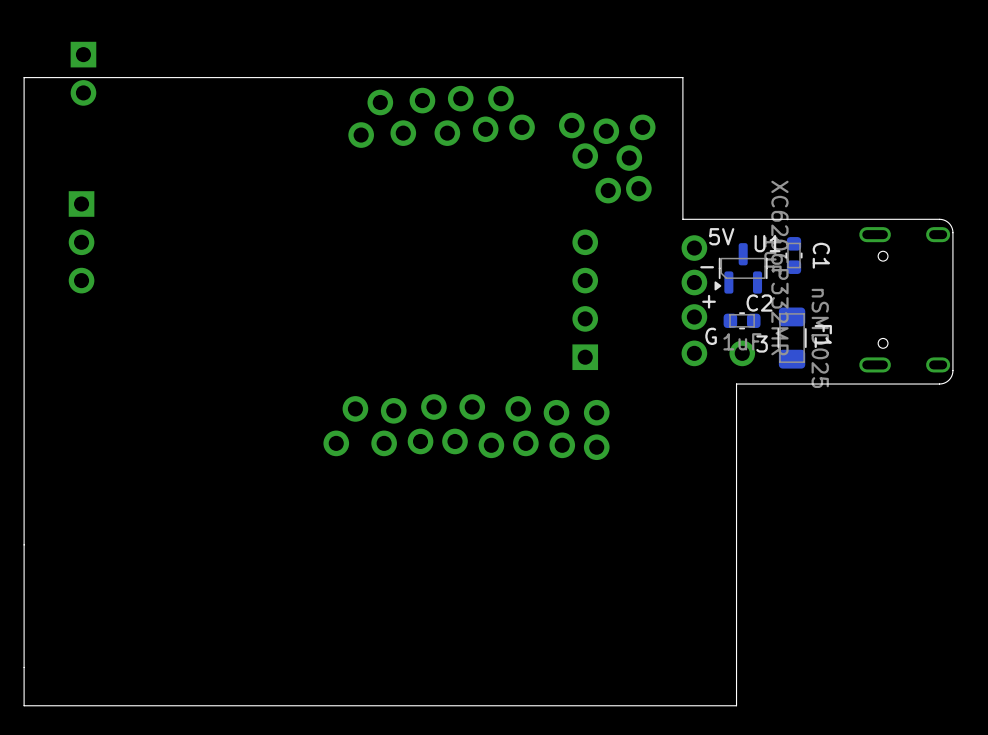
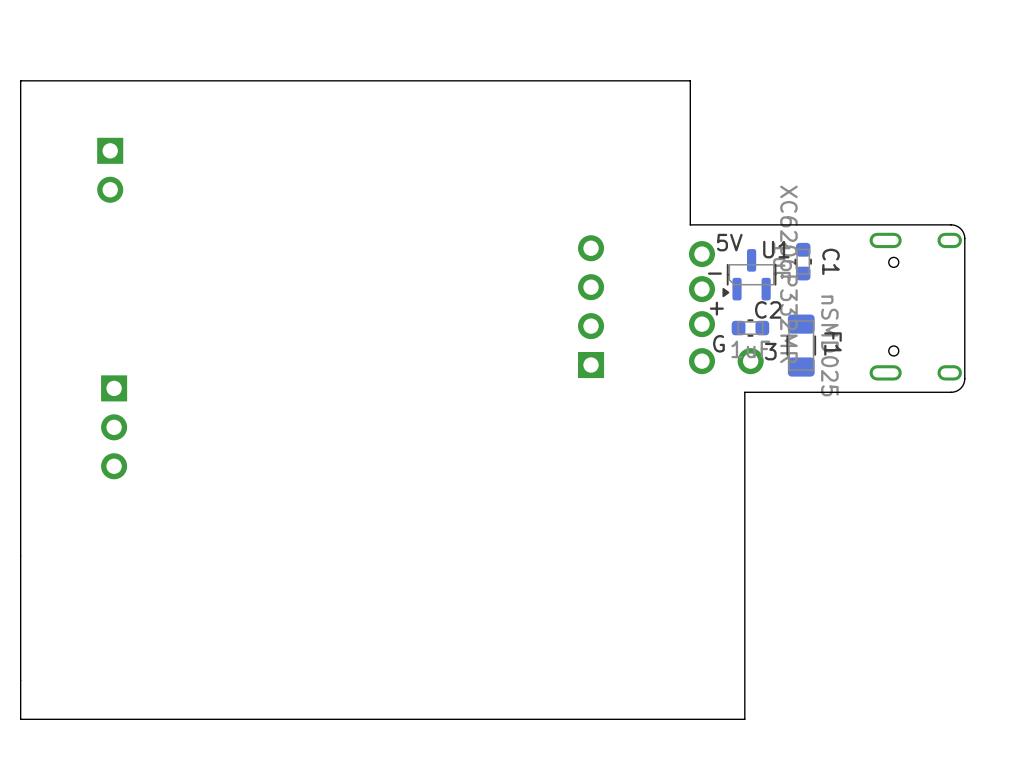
part position: (83, 73) -> (110, 170)
part: (460, 98) -> none
part: (500, 98) -> none
part: (422, 100) -> none
part: (380, 102) -> none
part: (571, 125) -> none
part: (522, 127) -> none
part: (642, 127) -> none
part: (485, 129) -> none
part: (606, 131) -> none
part: (403, 133) -> none
part: (447, 133) -> none
part: (361, 135) -> none
part: (585, 156) -> none
part: (629, 158) -> none
part: (638, 188) -> none
part: (608, 190) -> none
part position: (81, 242) -> (114, 427)
part: (433, 407) -> none
part: (472, 407) -> none
part: (355, 408) -> none
part: (518, 408) -> none
part: (393, 410) -> none
part: (556, 412) -> none
part: (596, 412) -> none
part: (420, 441) -> none
part: (455, 441) -> none
part: (336, 443) -> none
part: (384, 443) -> none
part: (525, 443) -> none
part: (491, 445) -> none
part: (562, 445) -> none
part: (596, 447) -> none

